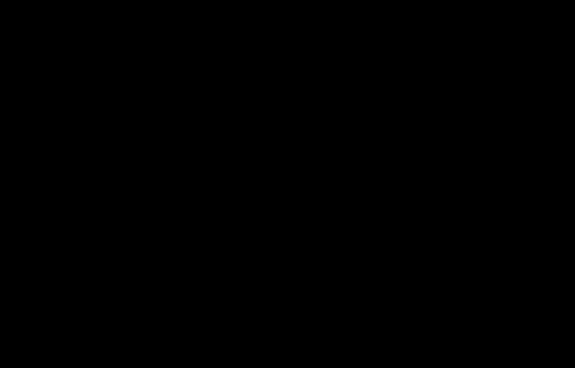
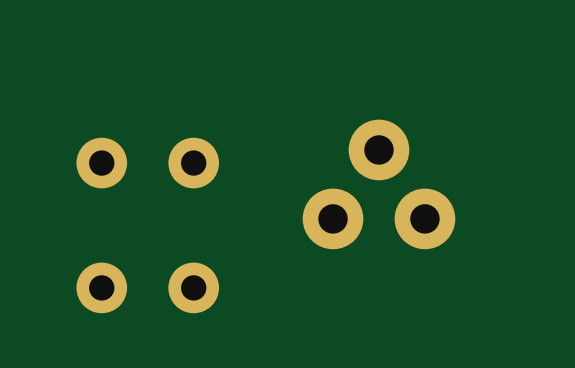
part: none -> (147, 163)
part: none -> (378, 184)
part: none -> (147, 287)

